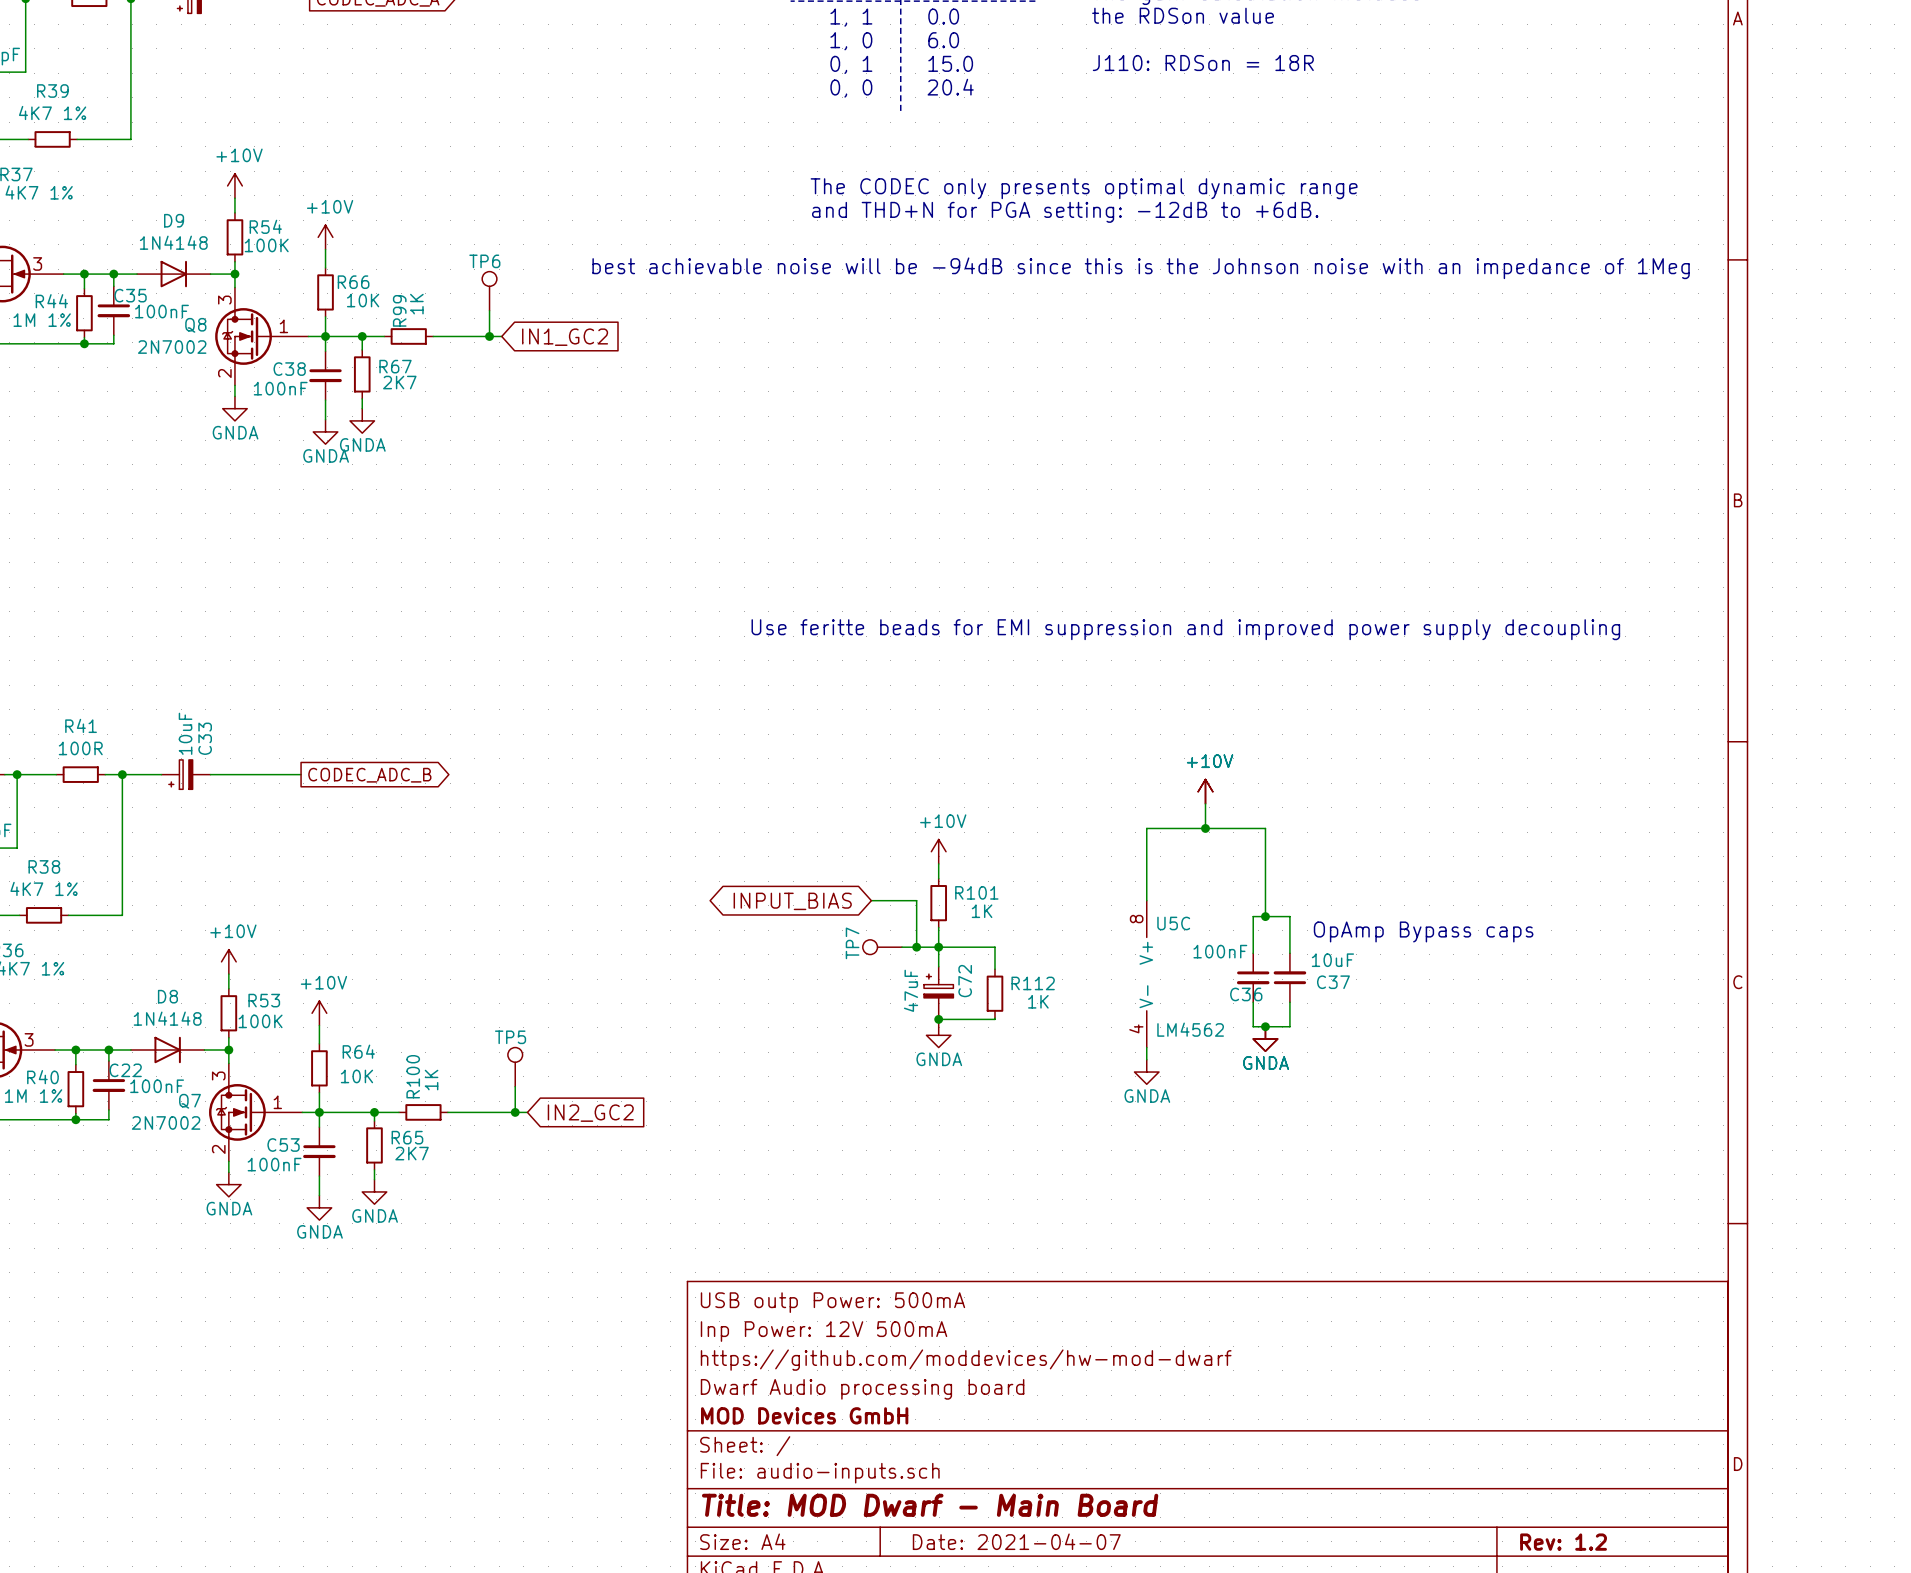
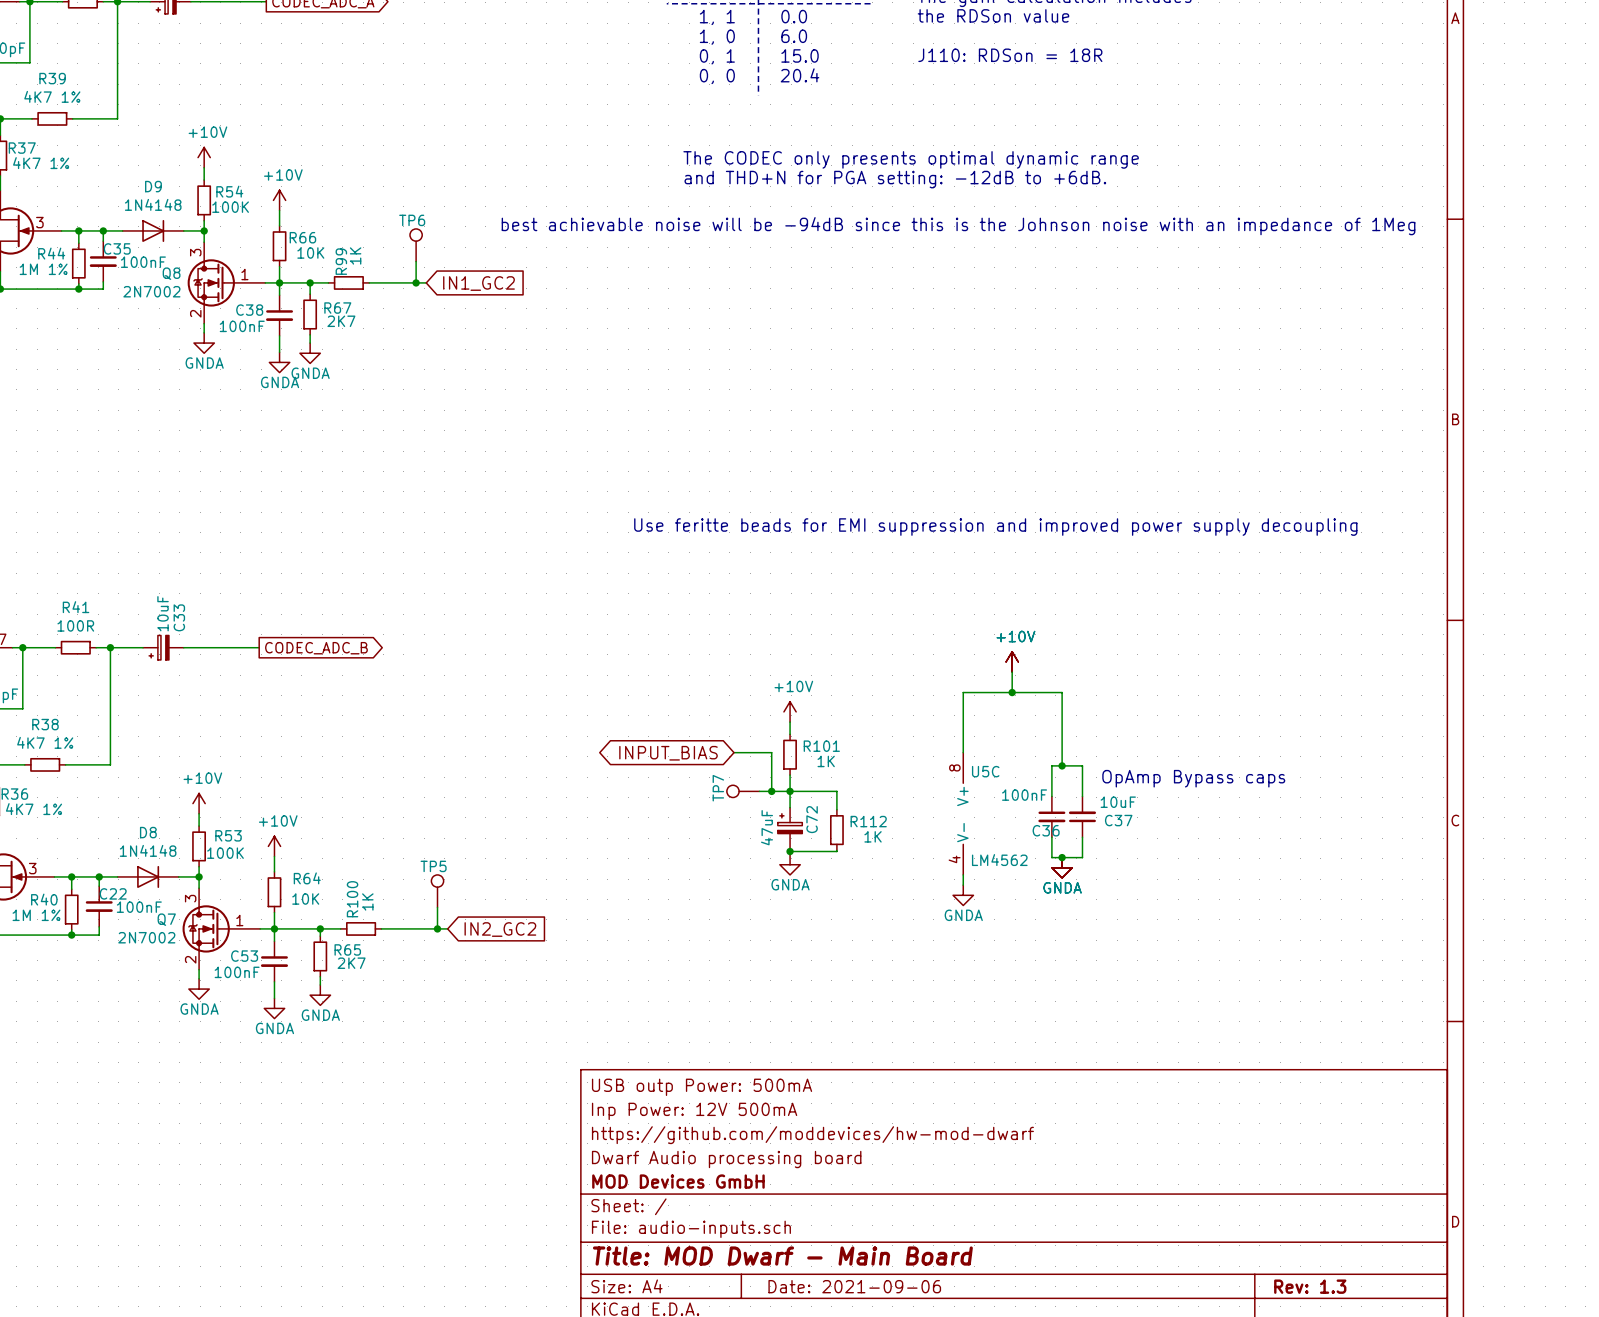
title block: Date: 2021-04-07 (1016, 1541) -> Date: 2021-09-06 (854, 1286)
title block: Rev: 1.2 (1563, 1542) -> Rev: 1.3 (1310, 1286)

